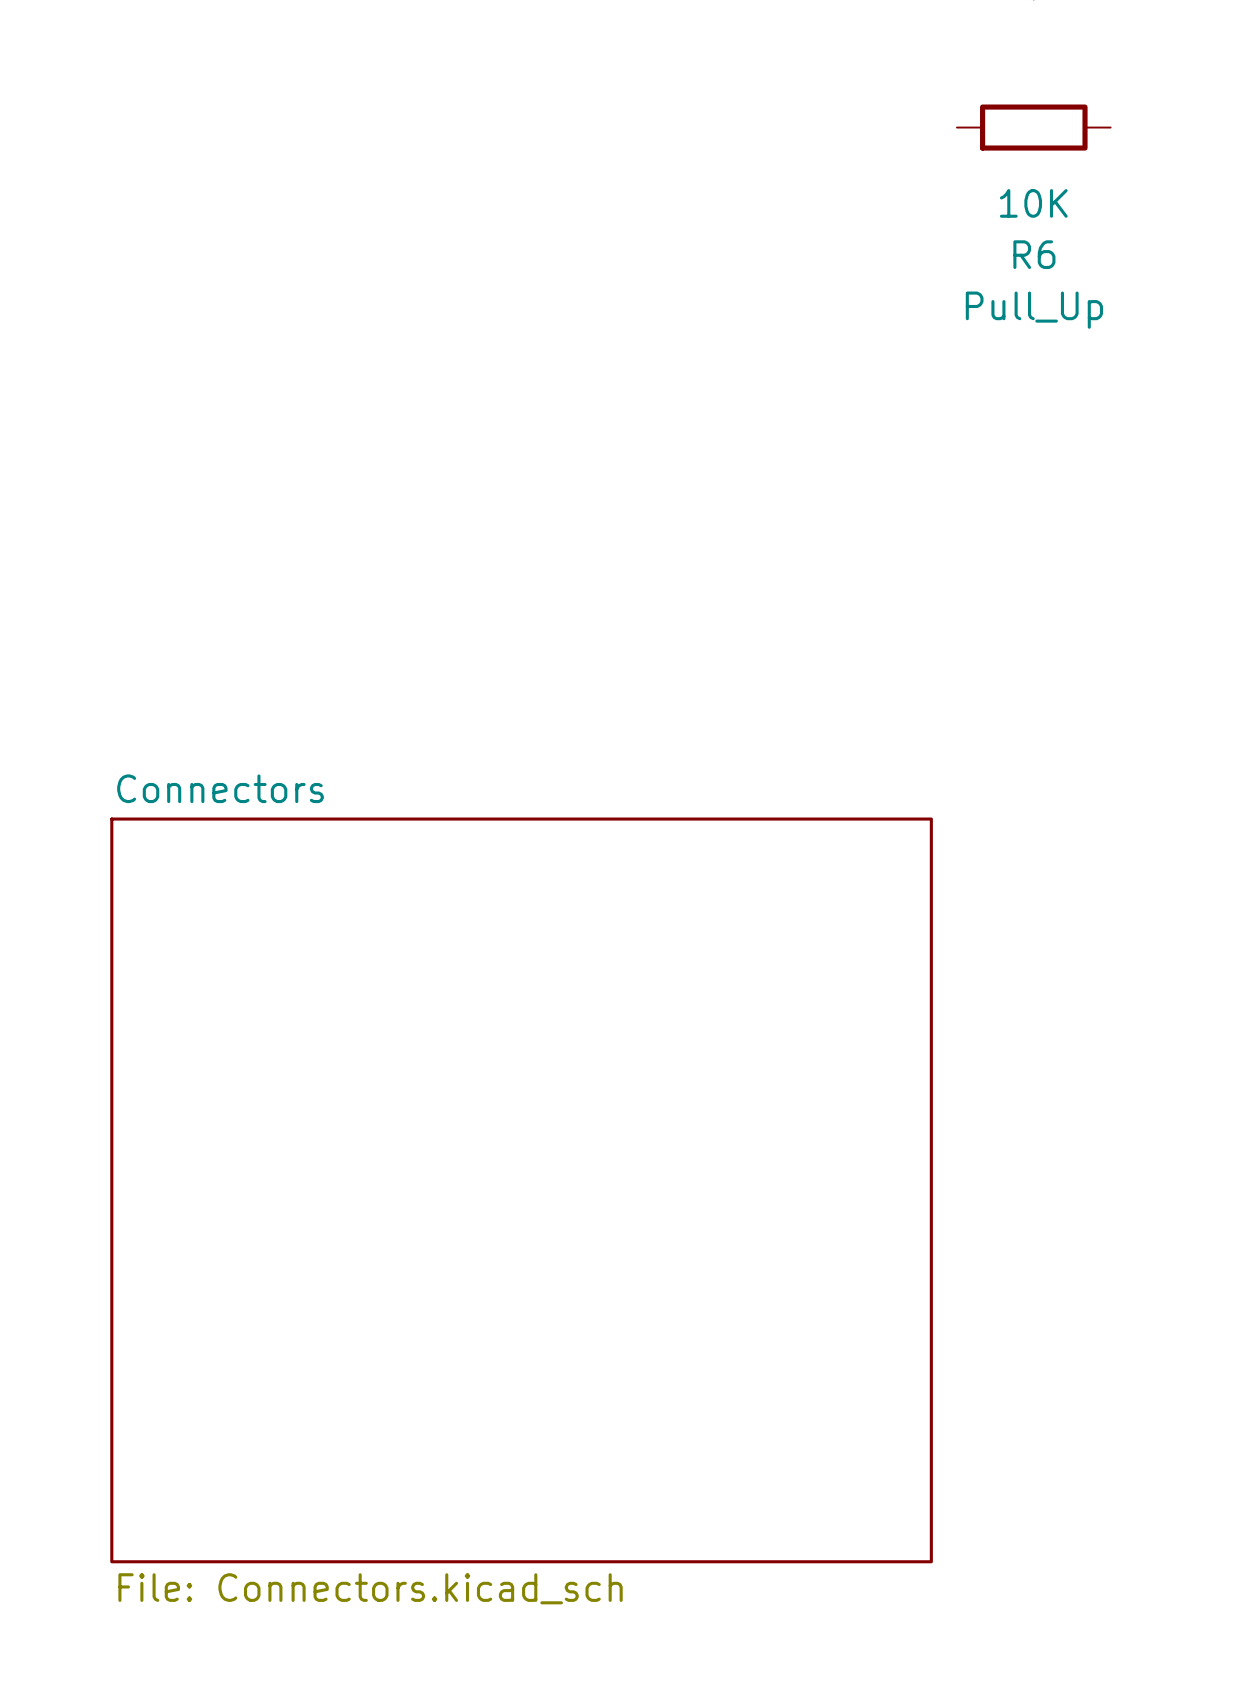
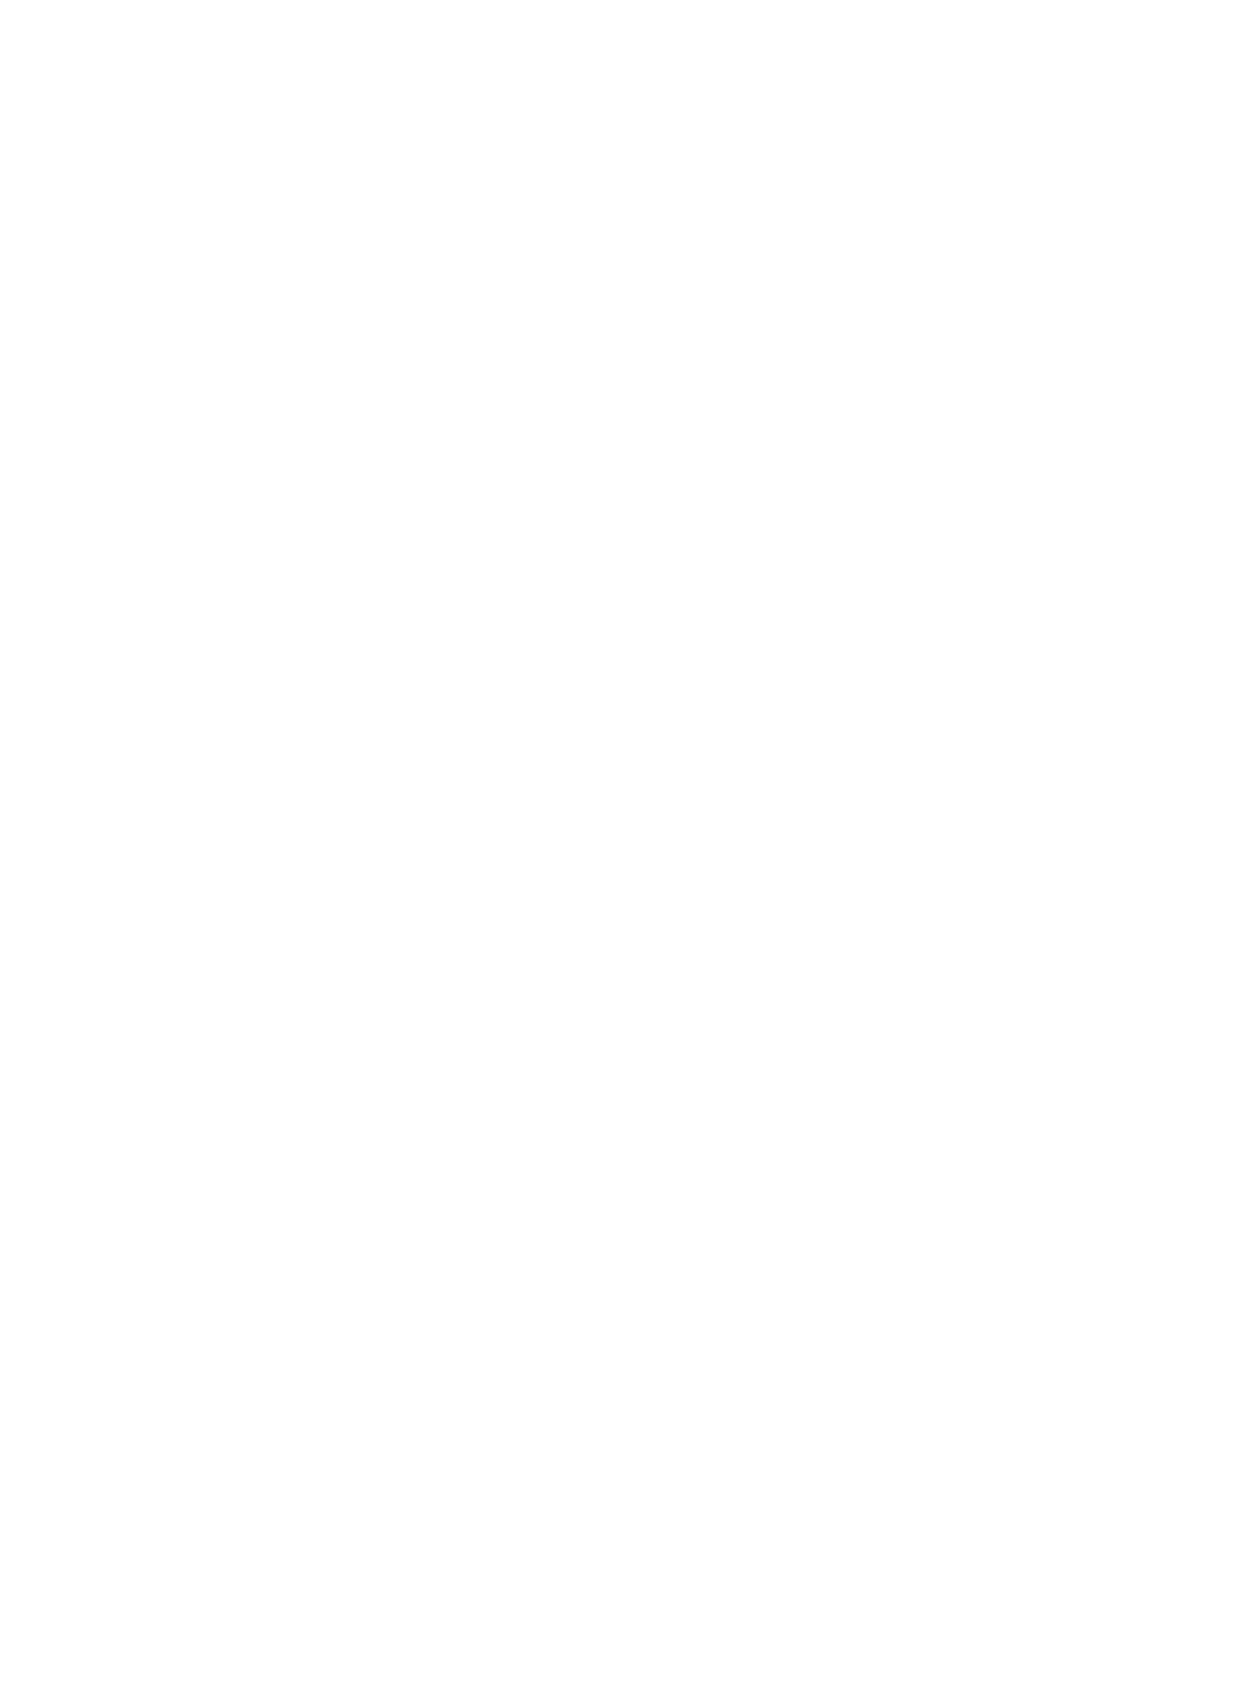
R6: 10K (1033, 127) -> none
sheet Connectors: File: Connectors.kicad_sch (521, 1190) -> none

